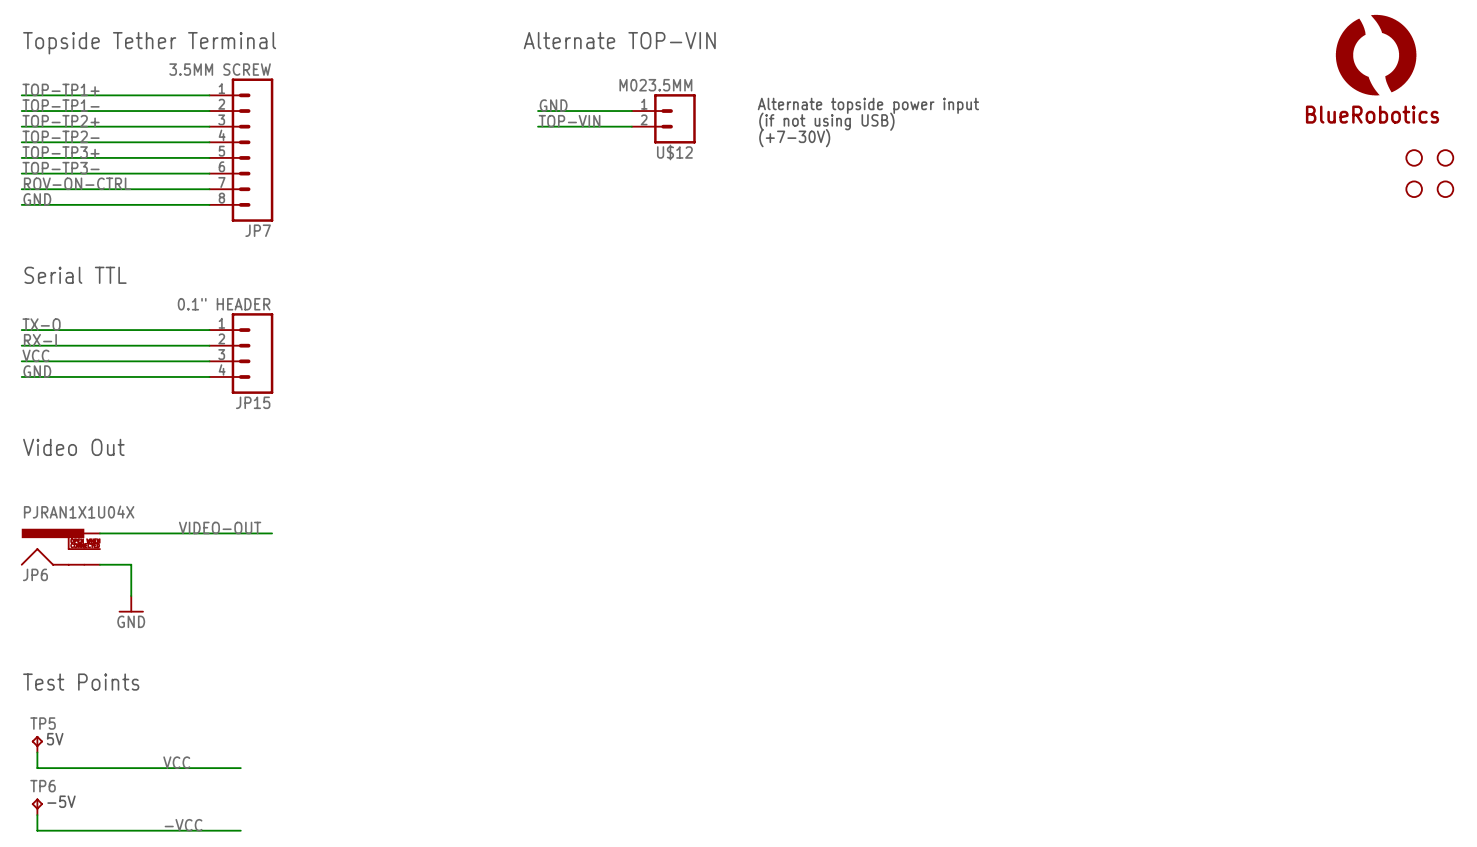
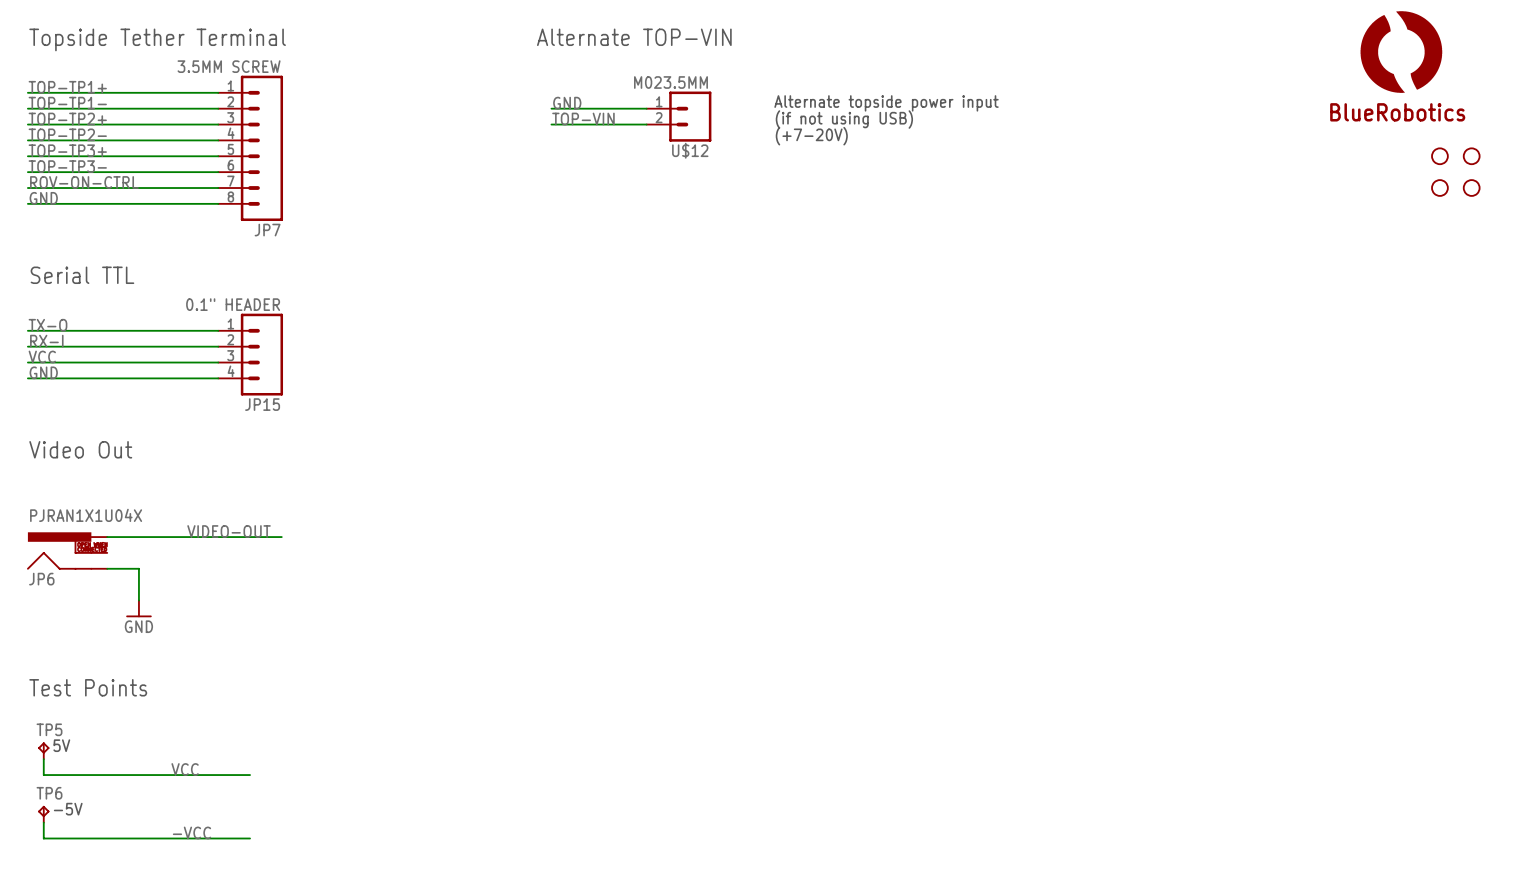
text: (+7-30V) (794, 138) -> (+7-20V) (811, 136)

